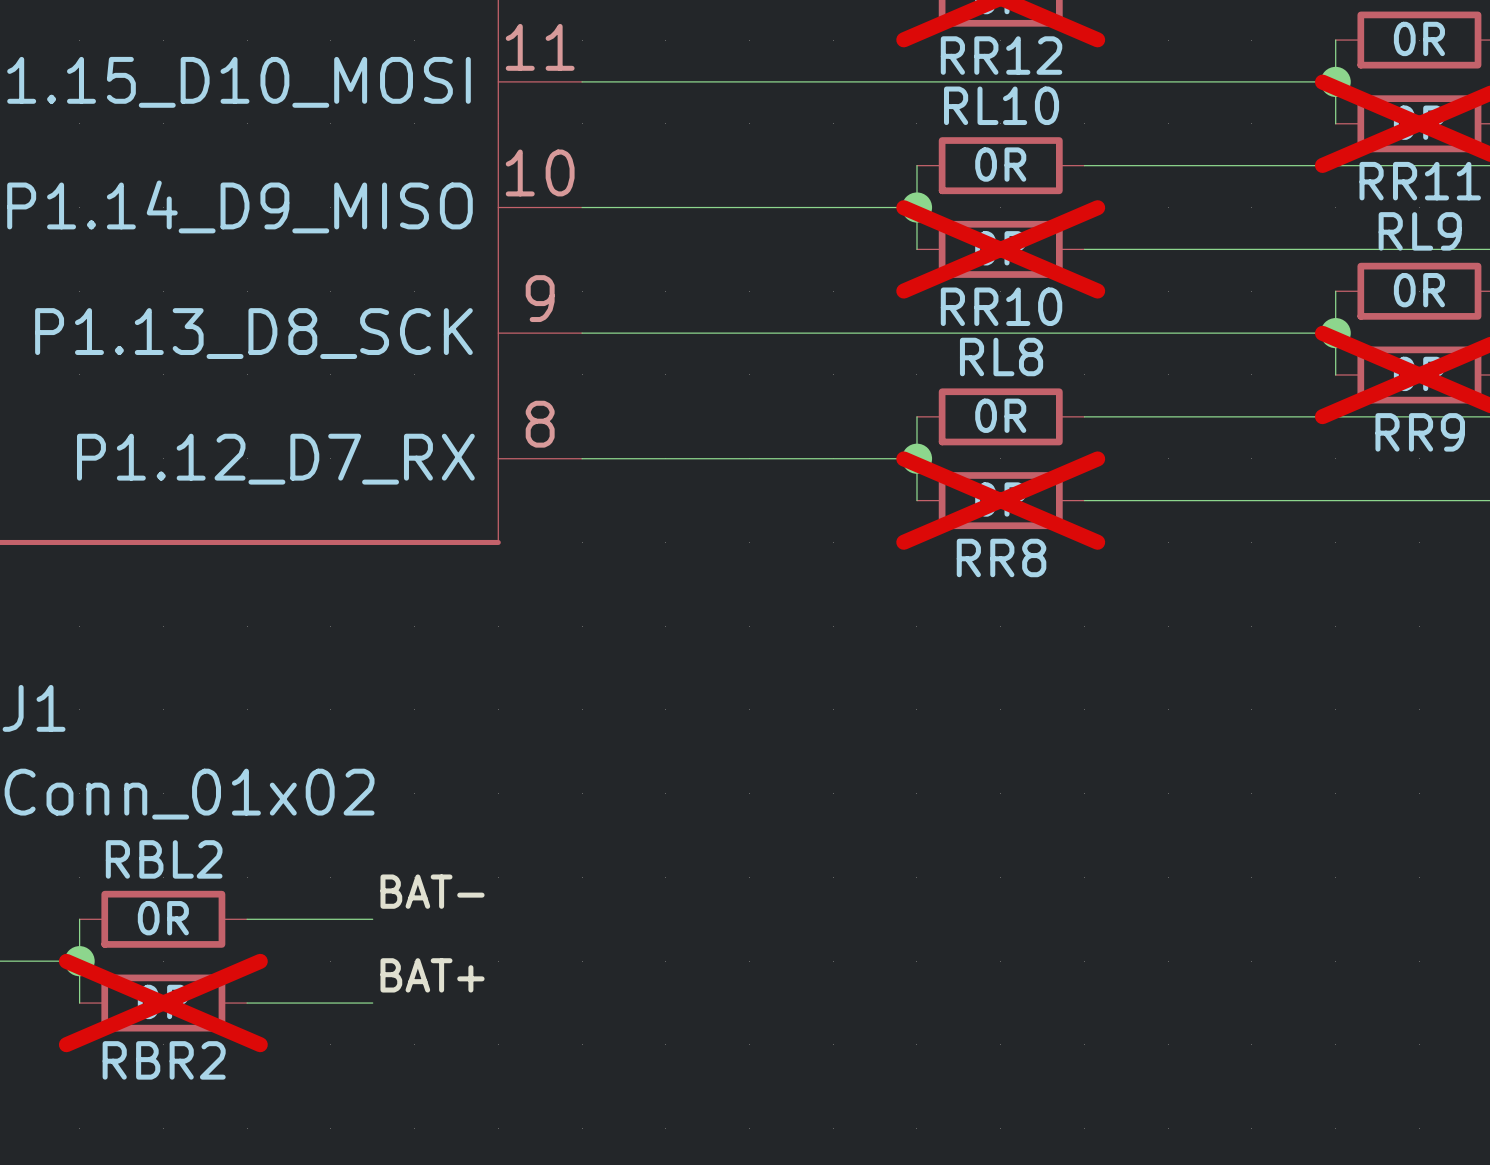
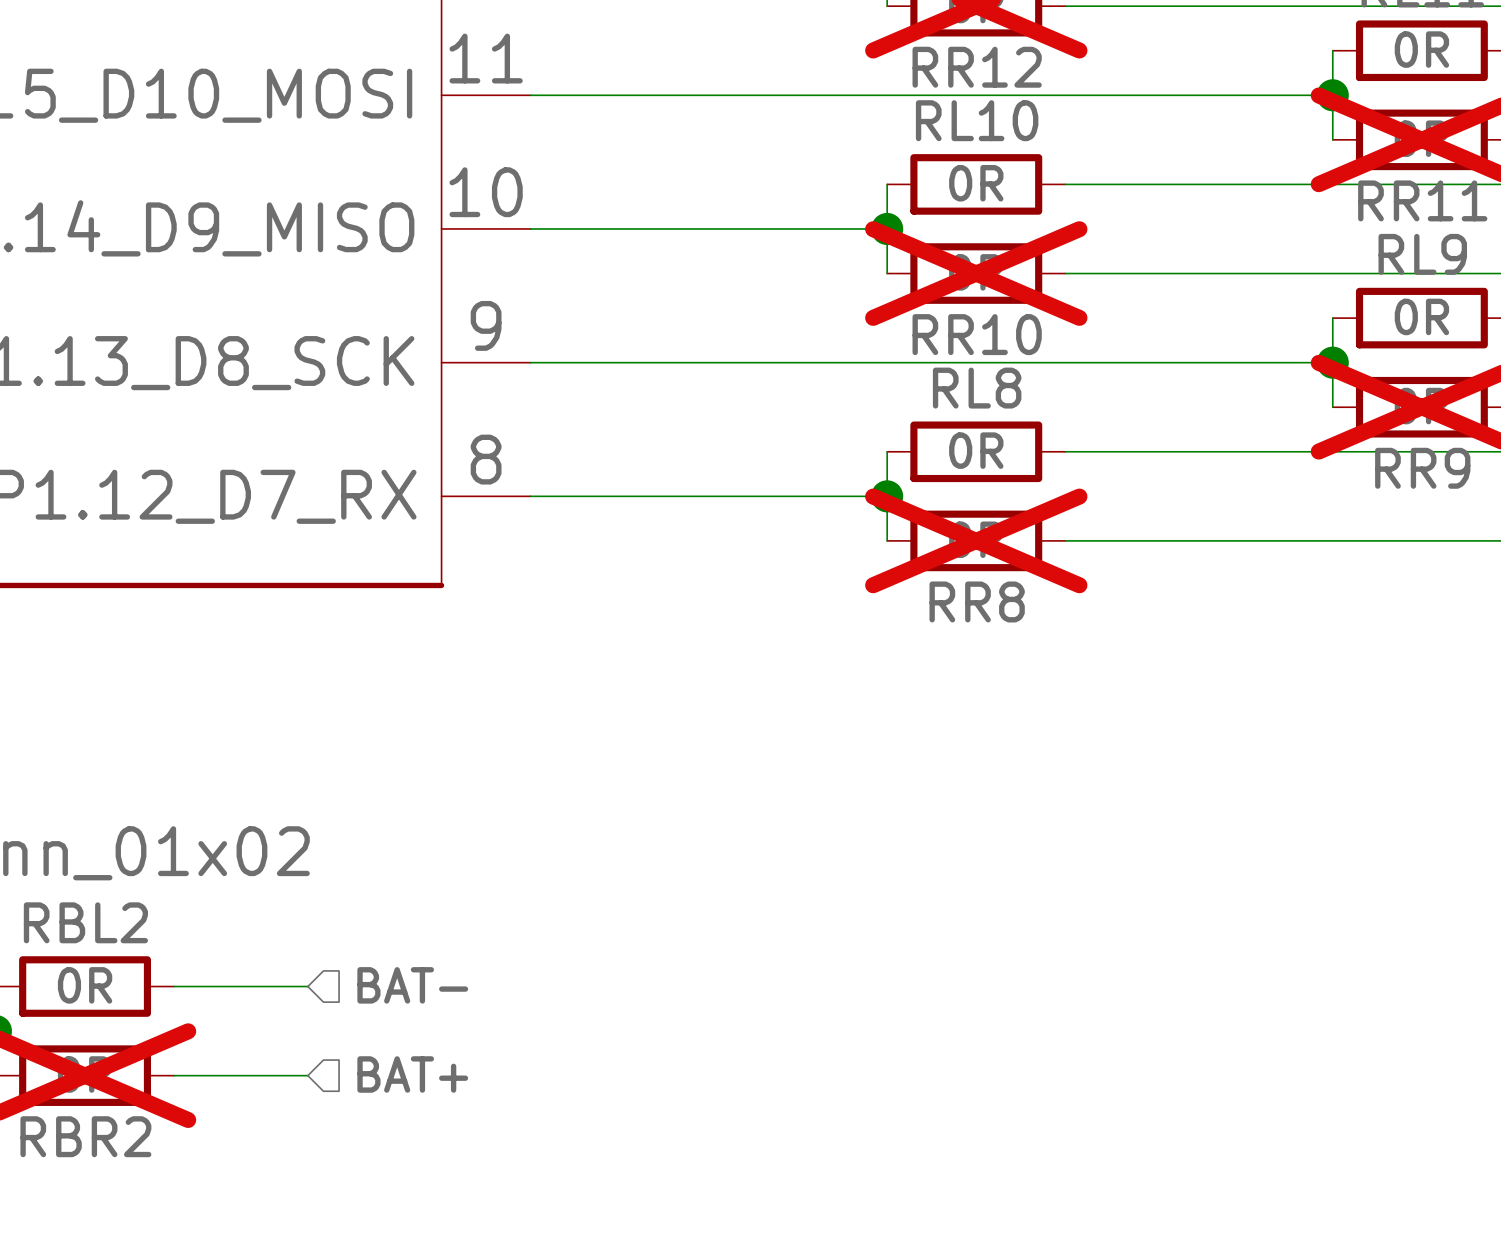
label: BAT- (432, 891) -> none
hierarchical label: none -> BAT- (412, 985)
label: BAT+ (432, 975) -> none
hierarchical label: none -> BAT+ (412, 1074)

